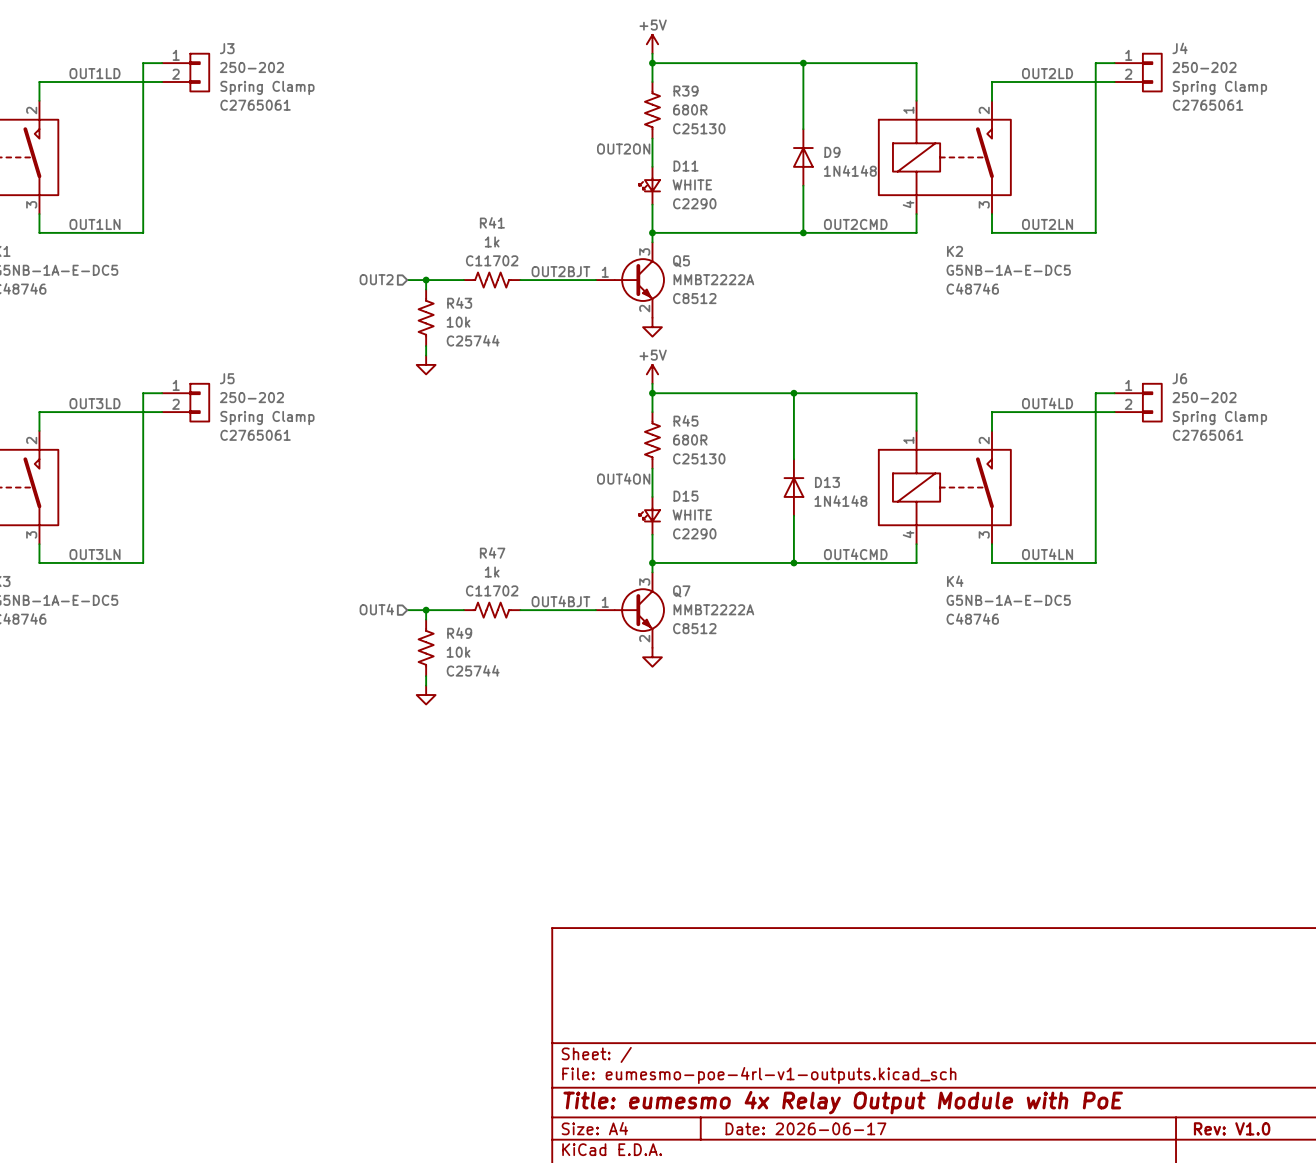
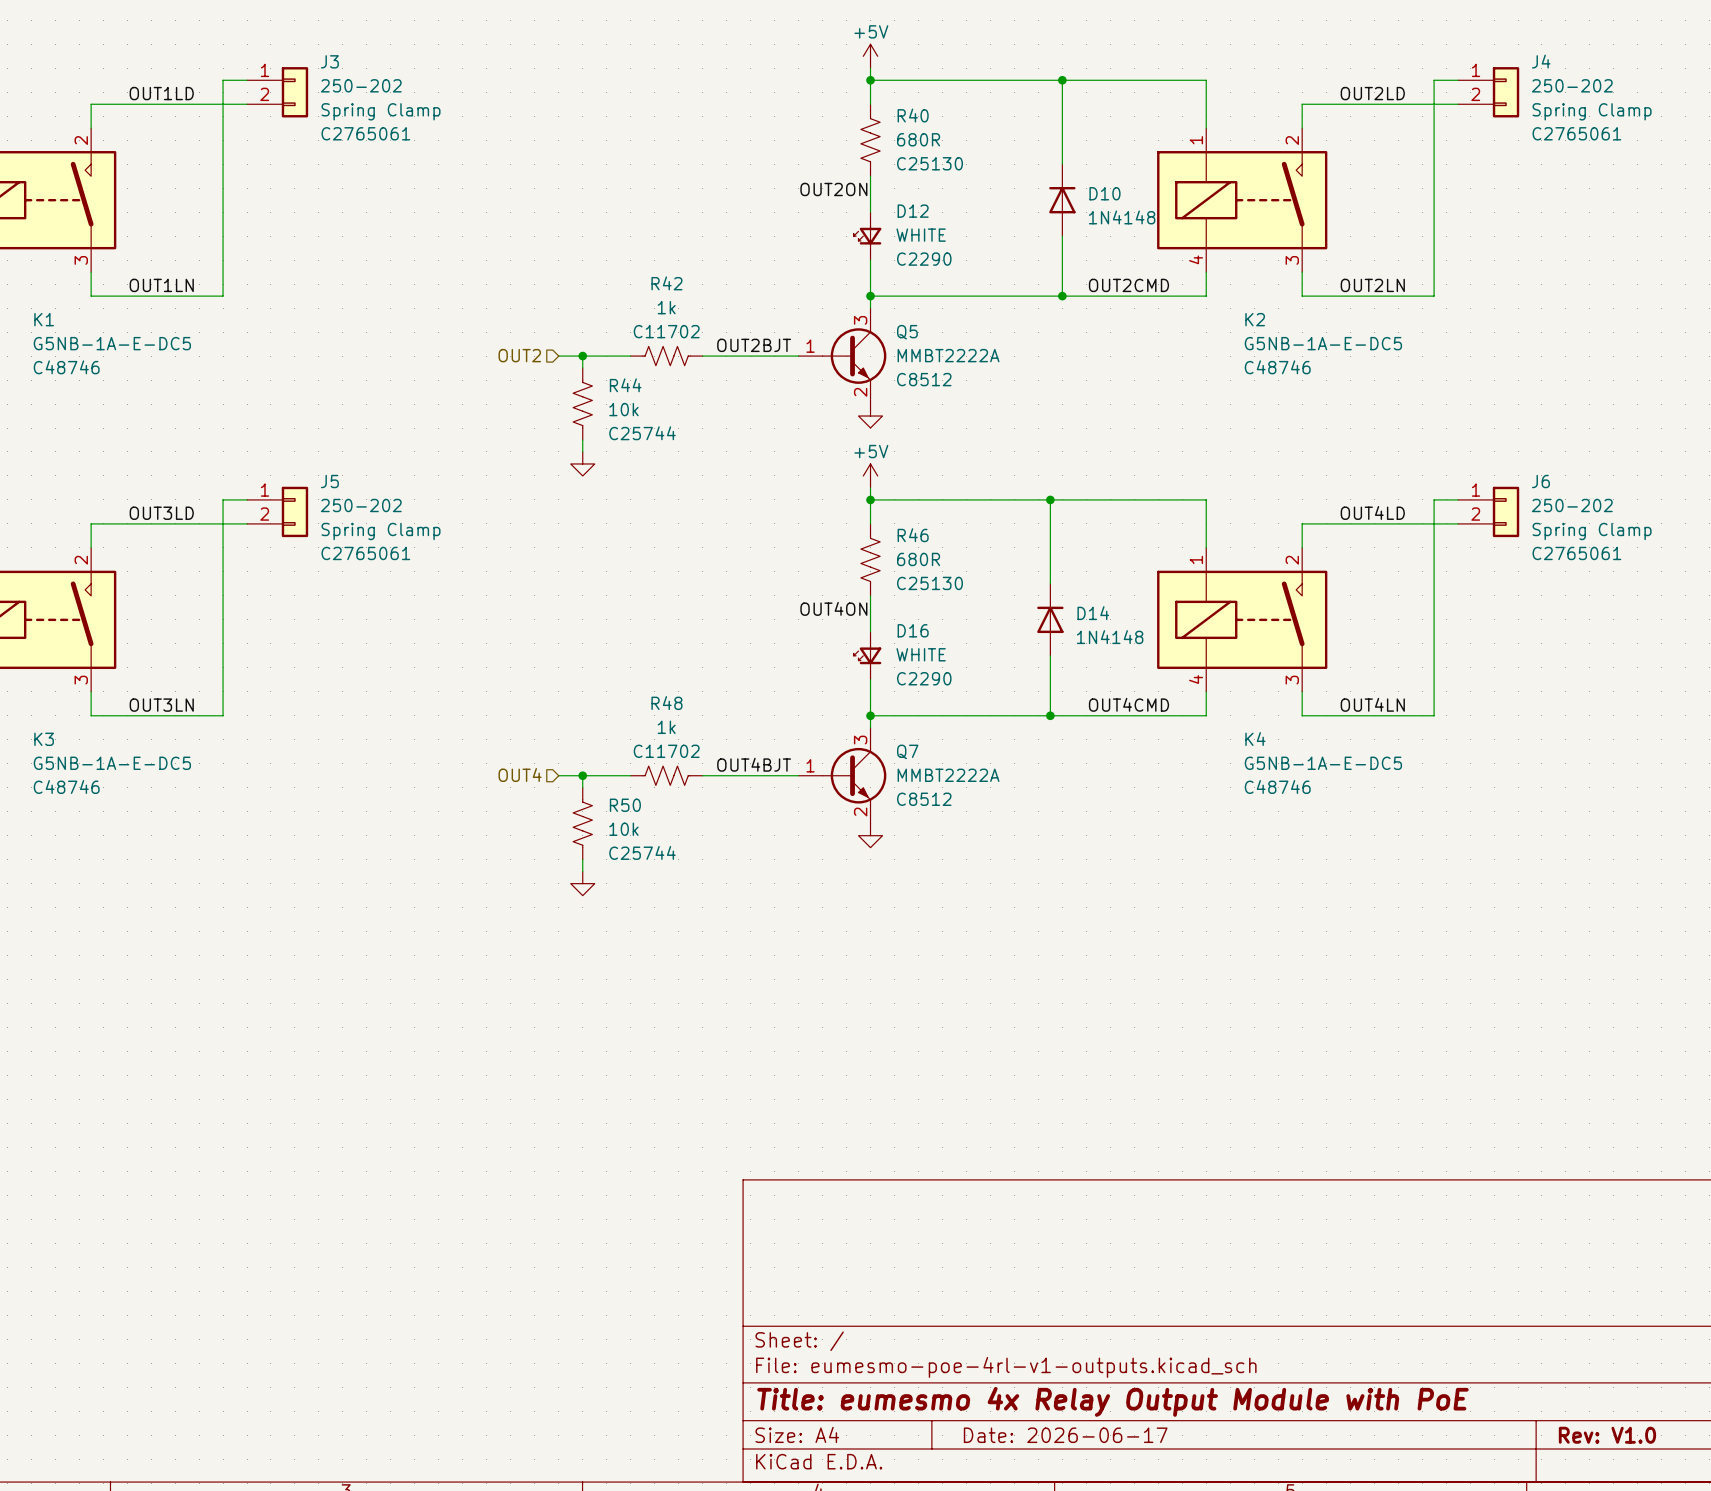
R39 name: R39 (686, 91) -> R40 (913, 115)
D9 name: D9 (832, 152) -> D10 (1104, 193)
D11 name: D11 (686, 166) -> D12 (913, 211)
R41 name: R41 (492, 222) -> R42 (666, 283)
R43 name: R43 (459, 303) -> R44 (625, 385)
R45 name: R45 (686, 420) -> R46 (913, 535)
D13 name: D13 (827, 482) -> D14 (1093, 613)
D15 name: D15 (686, 496) -> D16 (913, 630)
R47 name: R47 (492, 552) -> R48 (666, 703)
R49 name: R49 (459, 633) -> R50 (625, 805)

